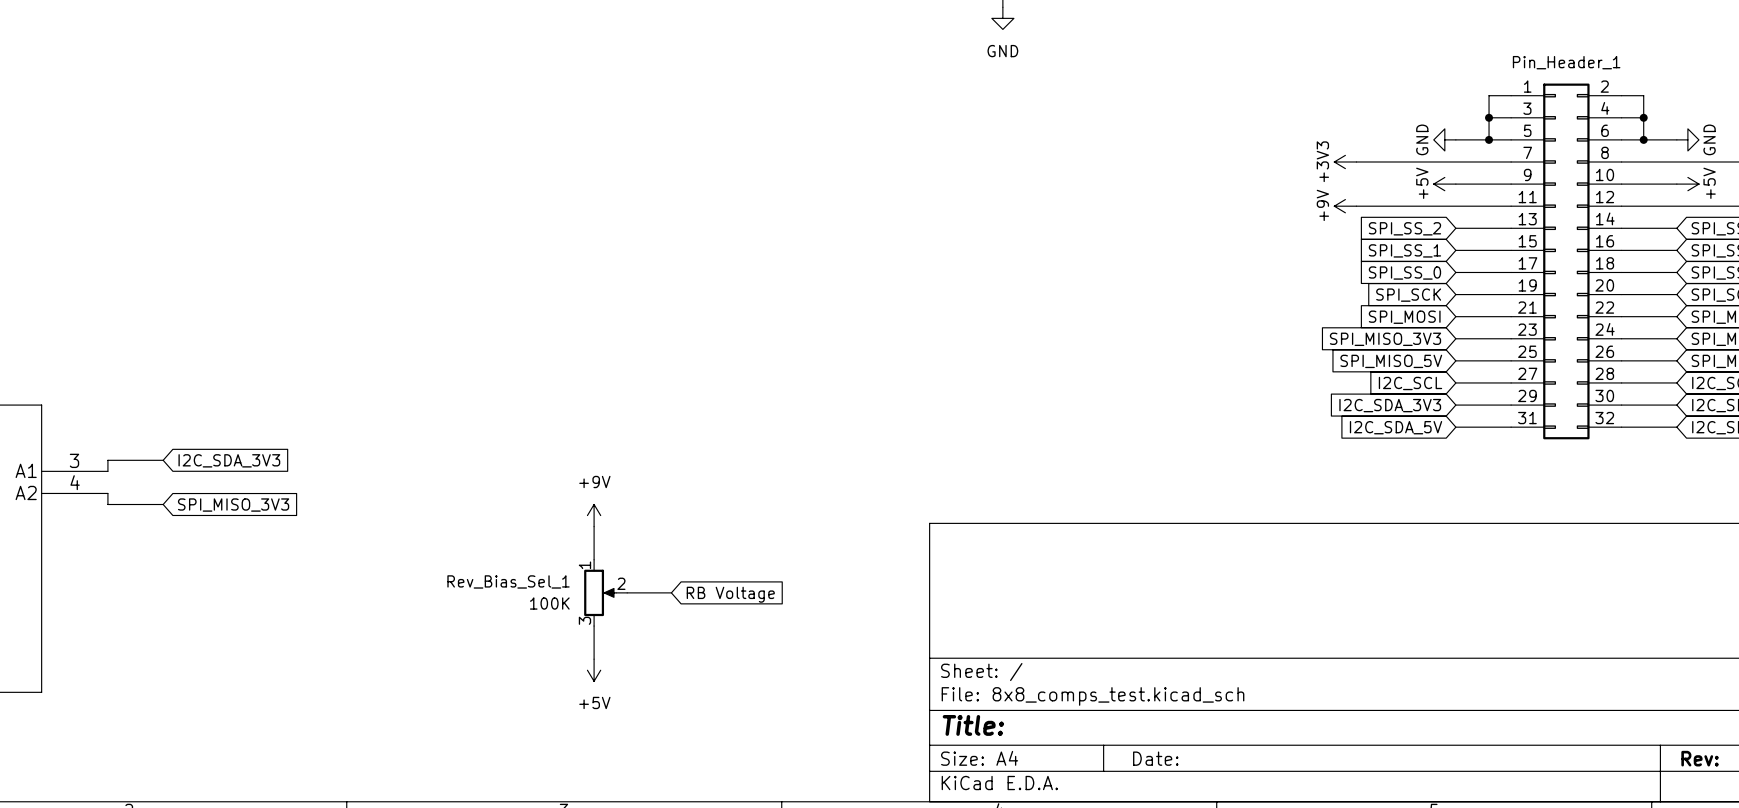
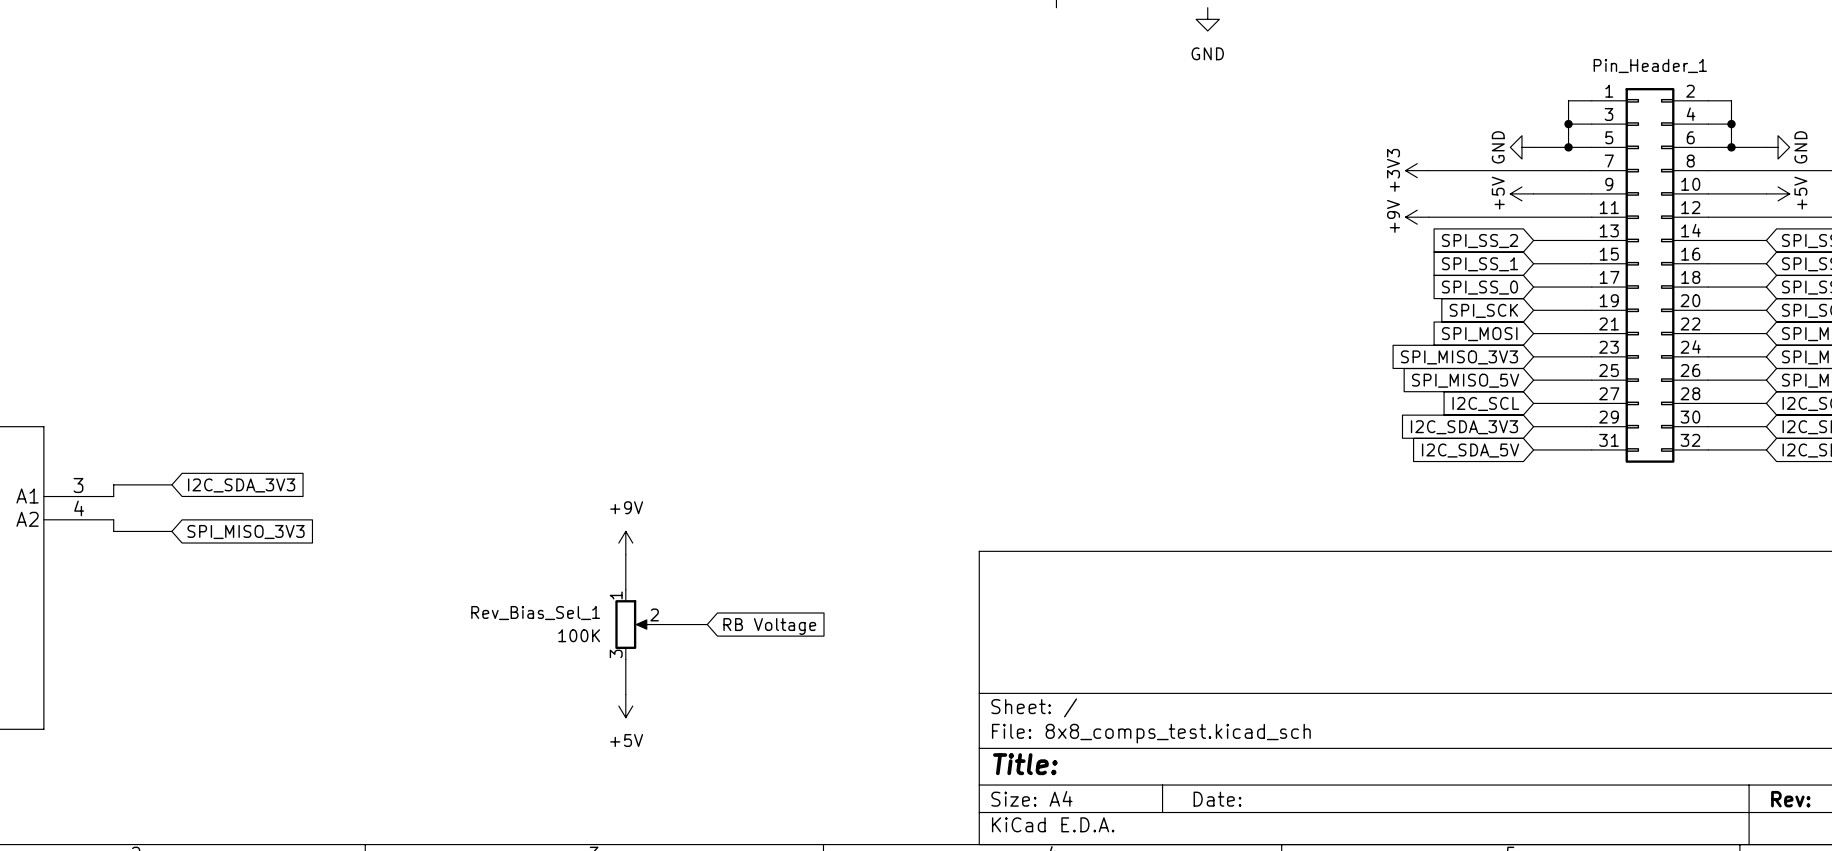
power symbol position: GND (1002, 18) -> GND (1207, 19)

